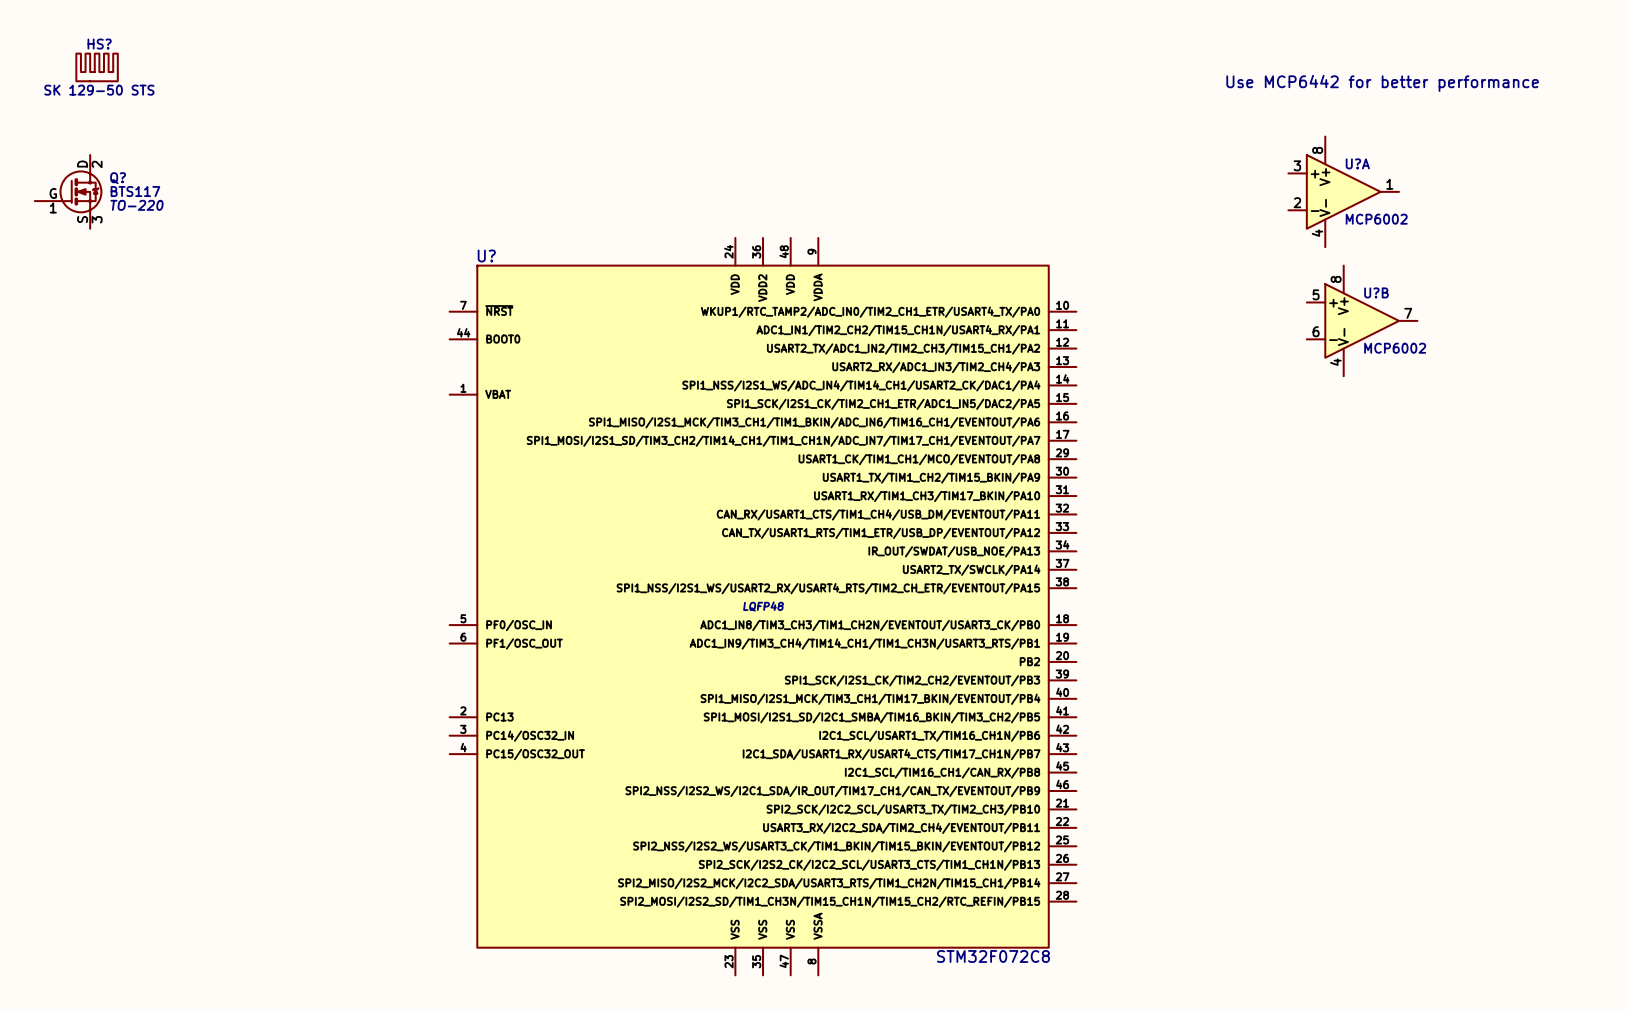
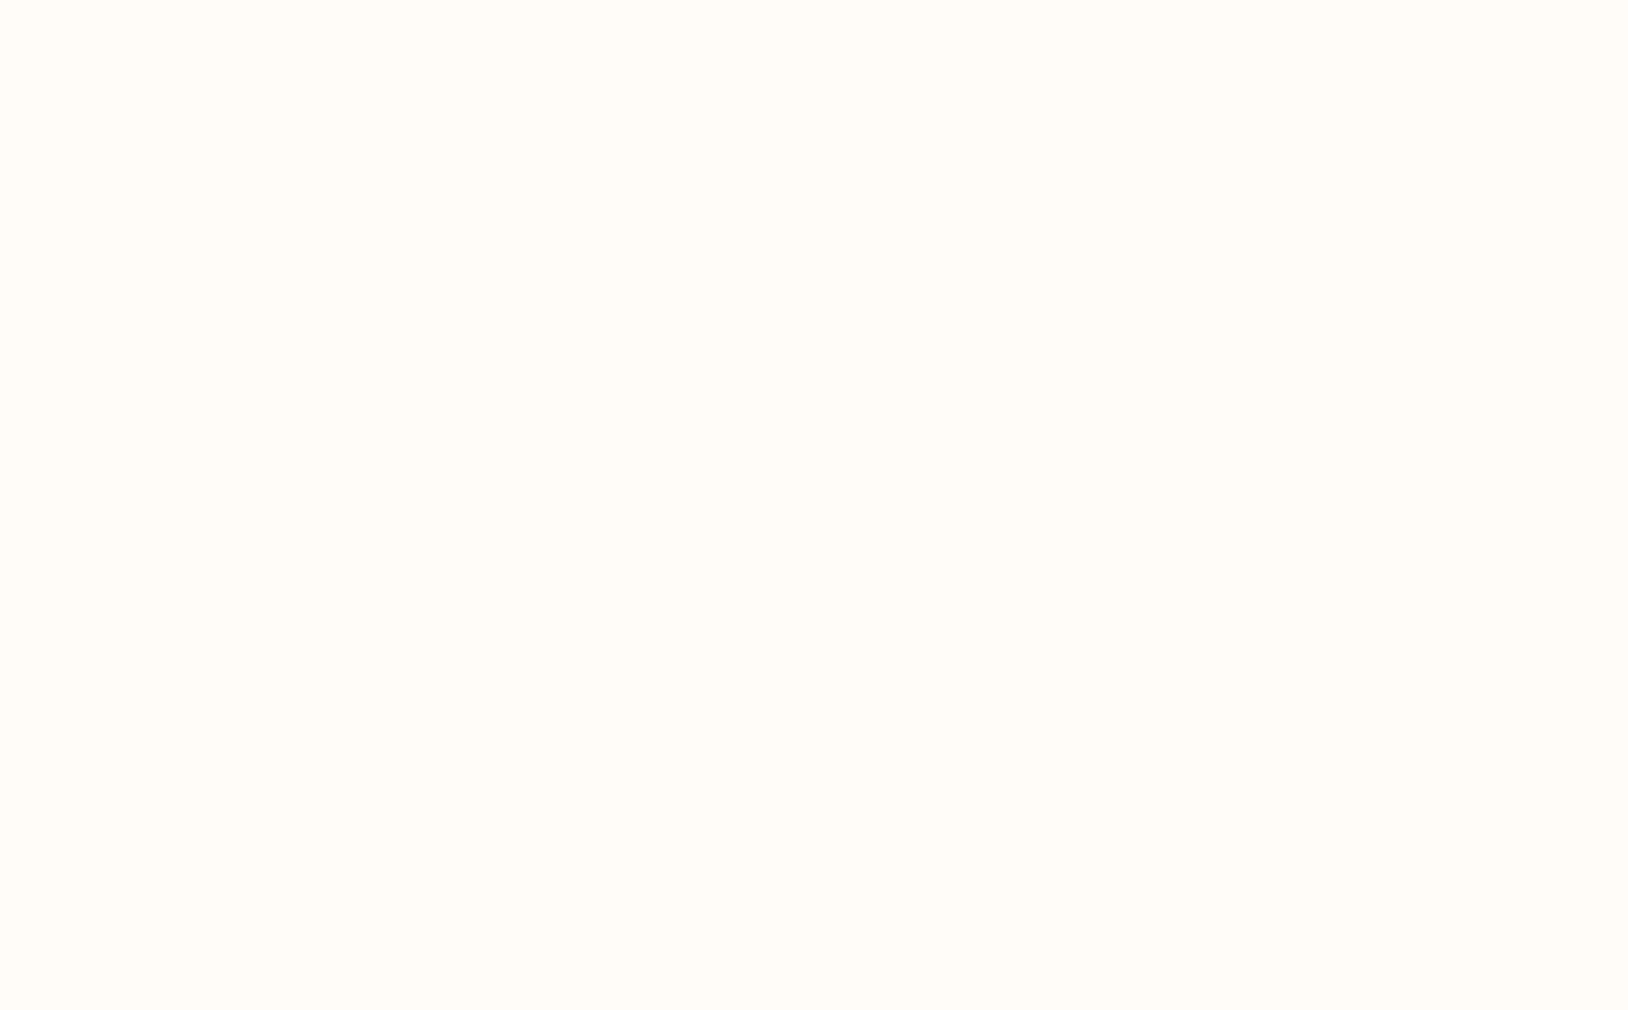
HS?: SK 129-50 STS (97, 67) -> none
text: Use MCP6442 for better performance (1382, 83) -> none
Q?: BTS117 (68, 191) -> none
U?A: MCP6002 (1343, 191) -> none
U?B: MCP6002 (1362, 320) -> none
U?: STM32F072C8 (763, 606) -> none

